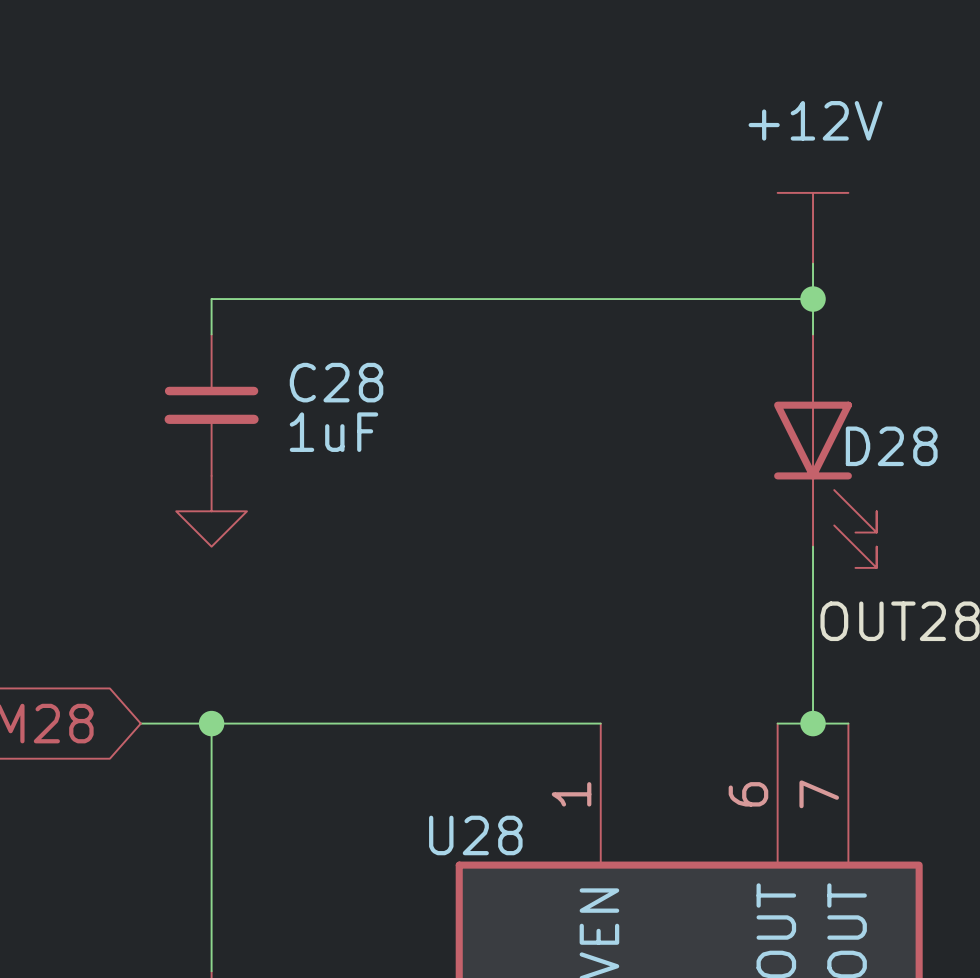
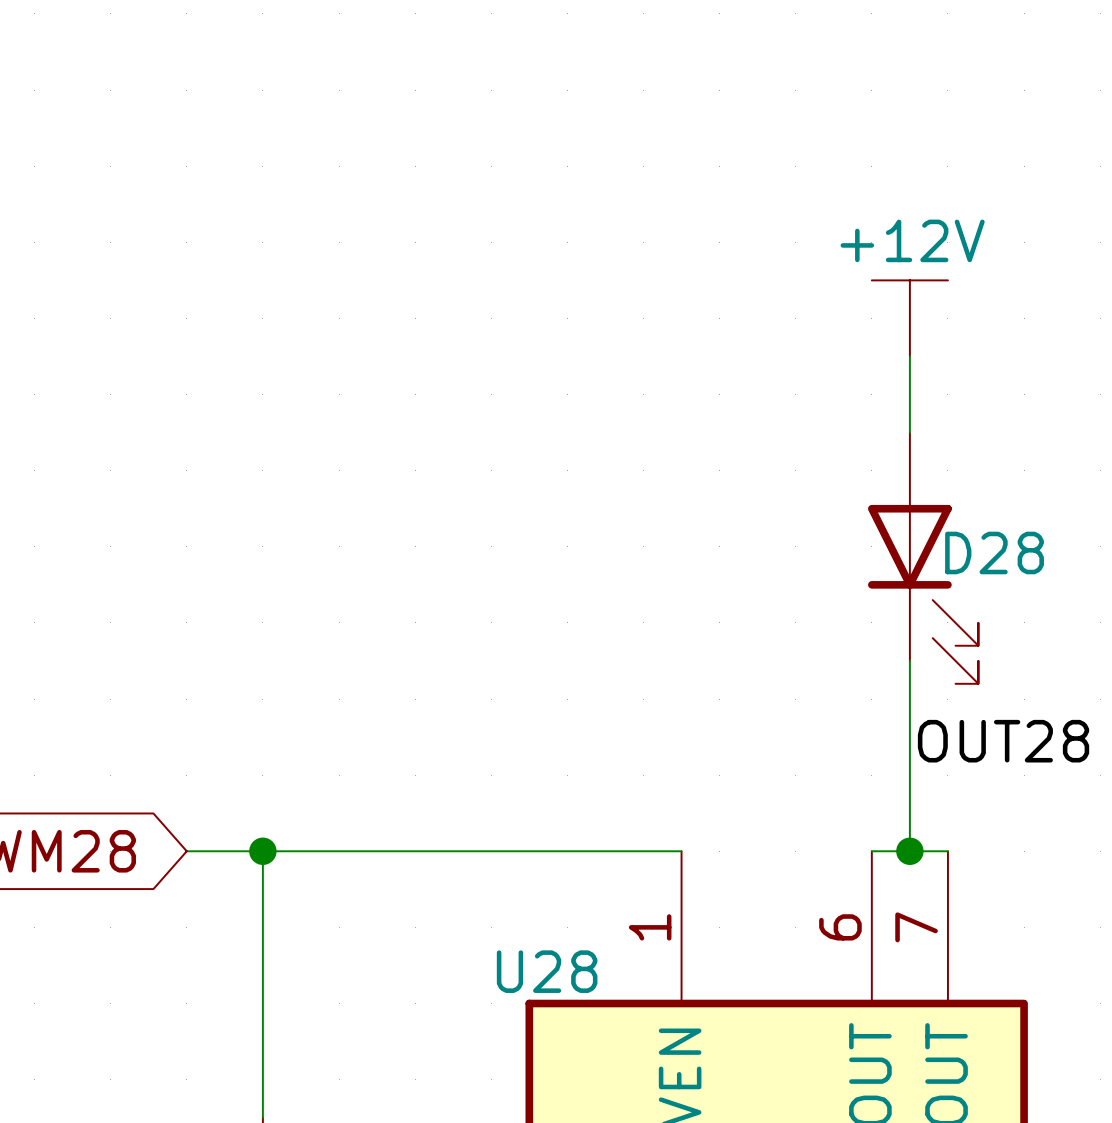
power symbol text position: +12V (815, 120) -> +12V (912, 240)
wire: (813, 299) (211, 299) (211, 334) -> none
junction: (813, 299) -> none
C28: 1uF (211, 405) -> none
power symbol: (211, 511) -> none

